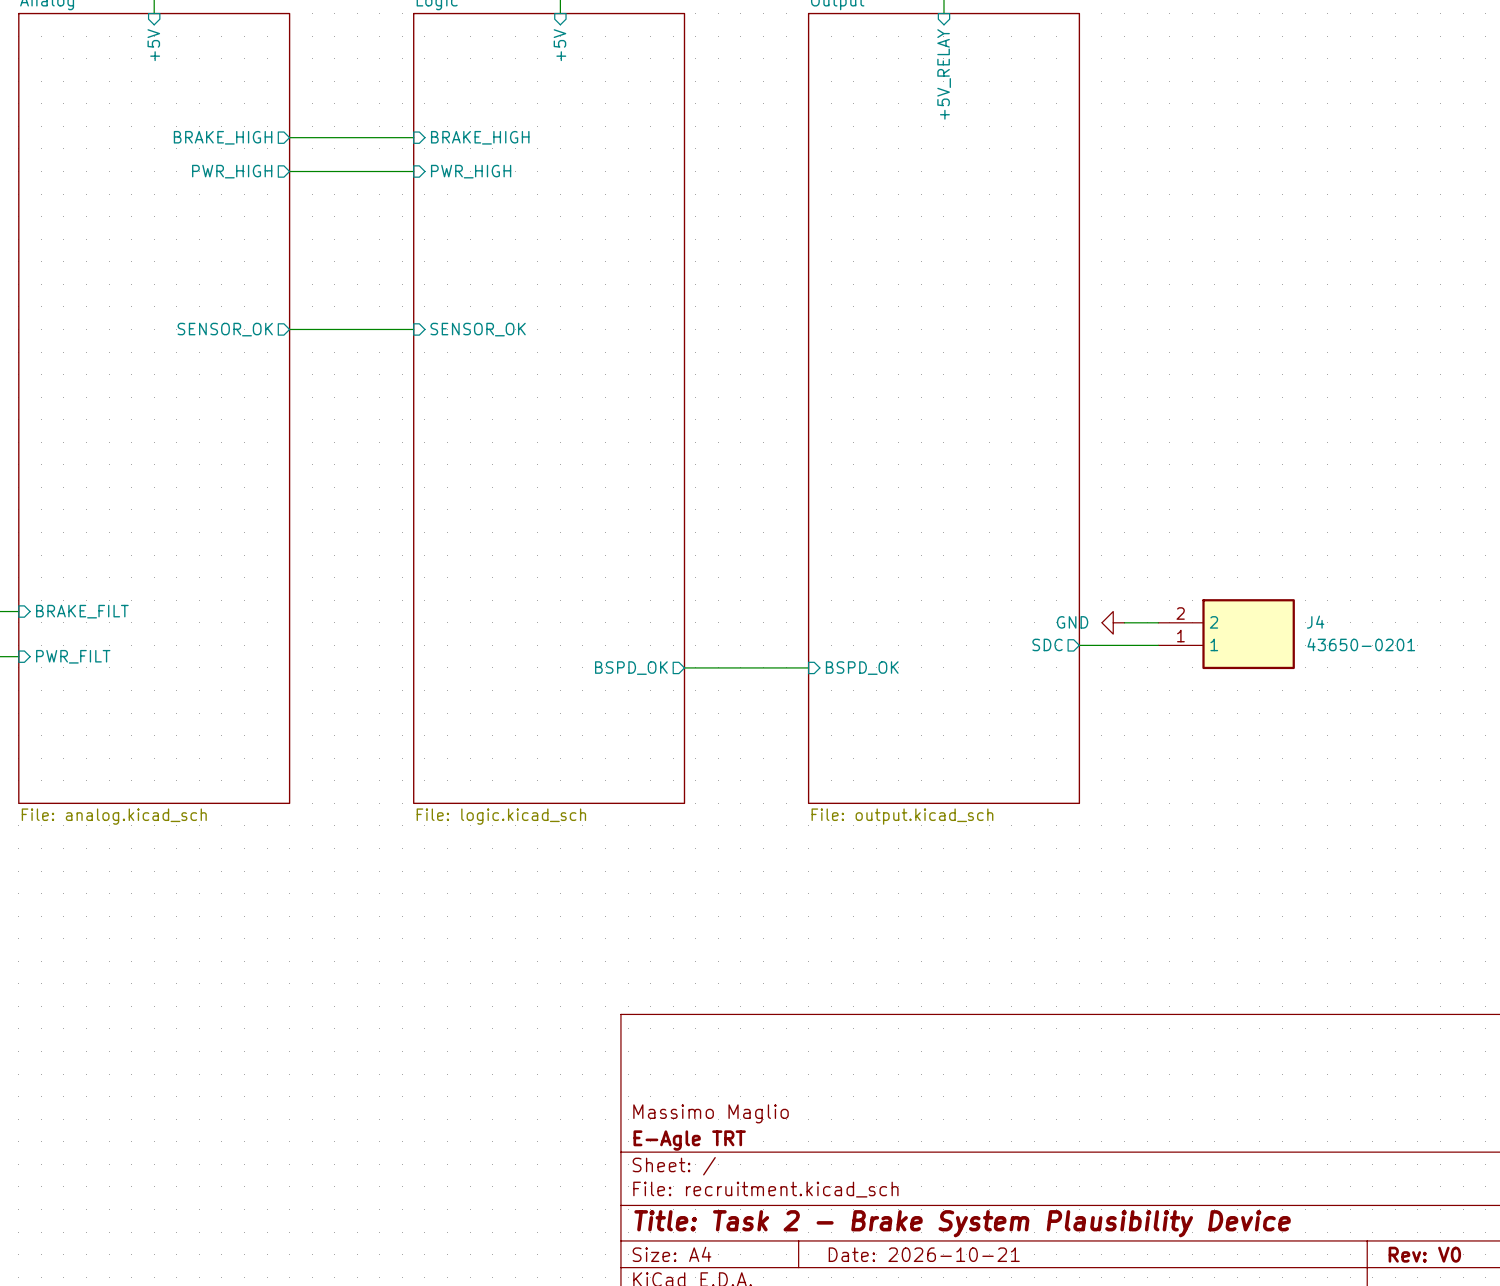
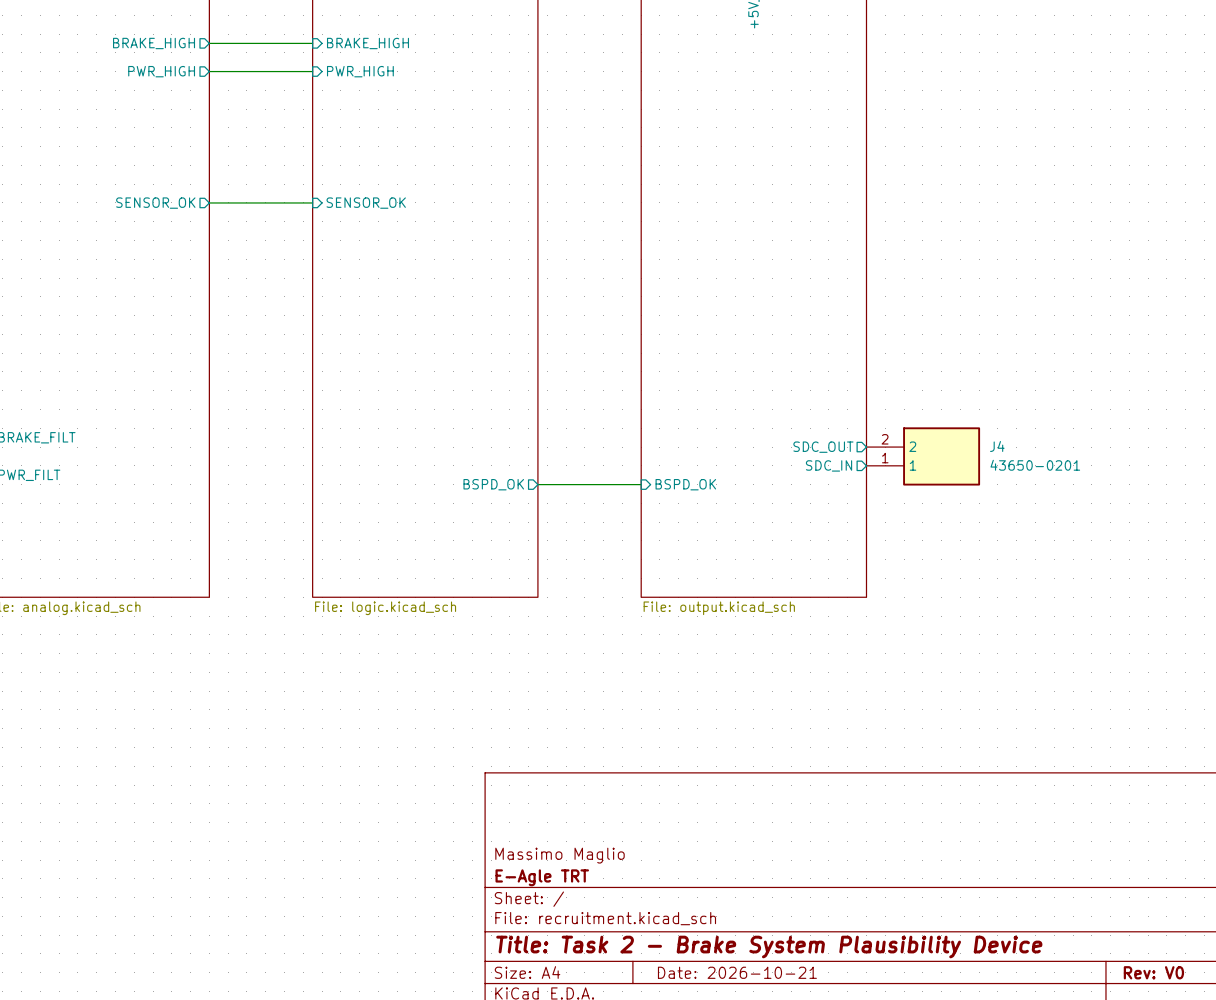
sheet pin: none -> SDC_OUT (823, 447)
power symbol: GND (1113, 622) -> none
J4 position: (1226, 634) -> (923, 456)
sheet pin: SDC (1047, 644) -> SDC_IN (829, 465)

